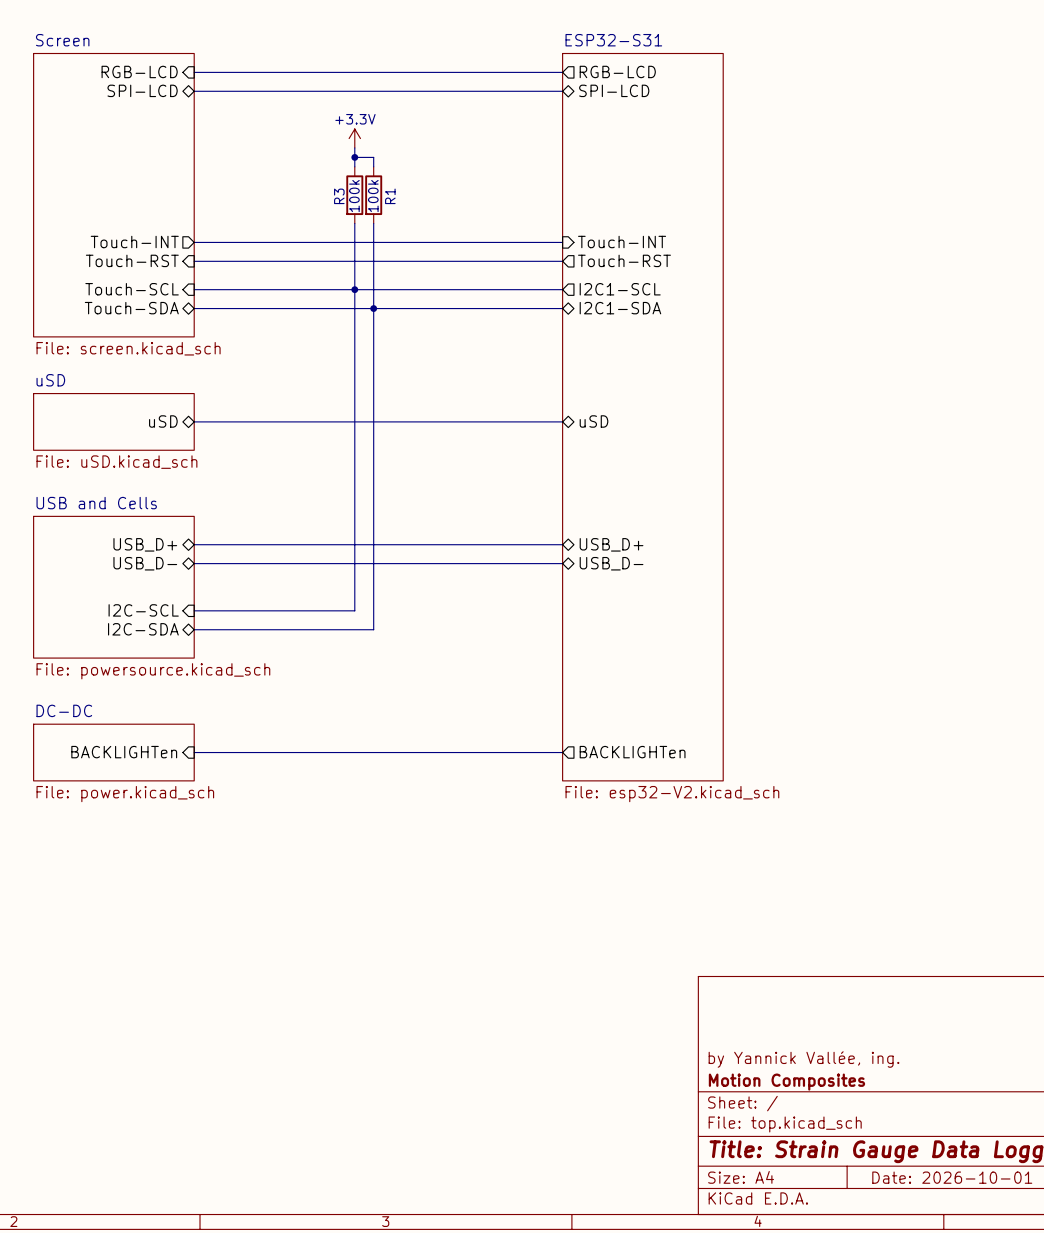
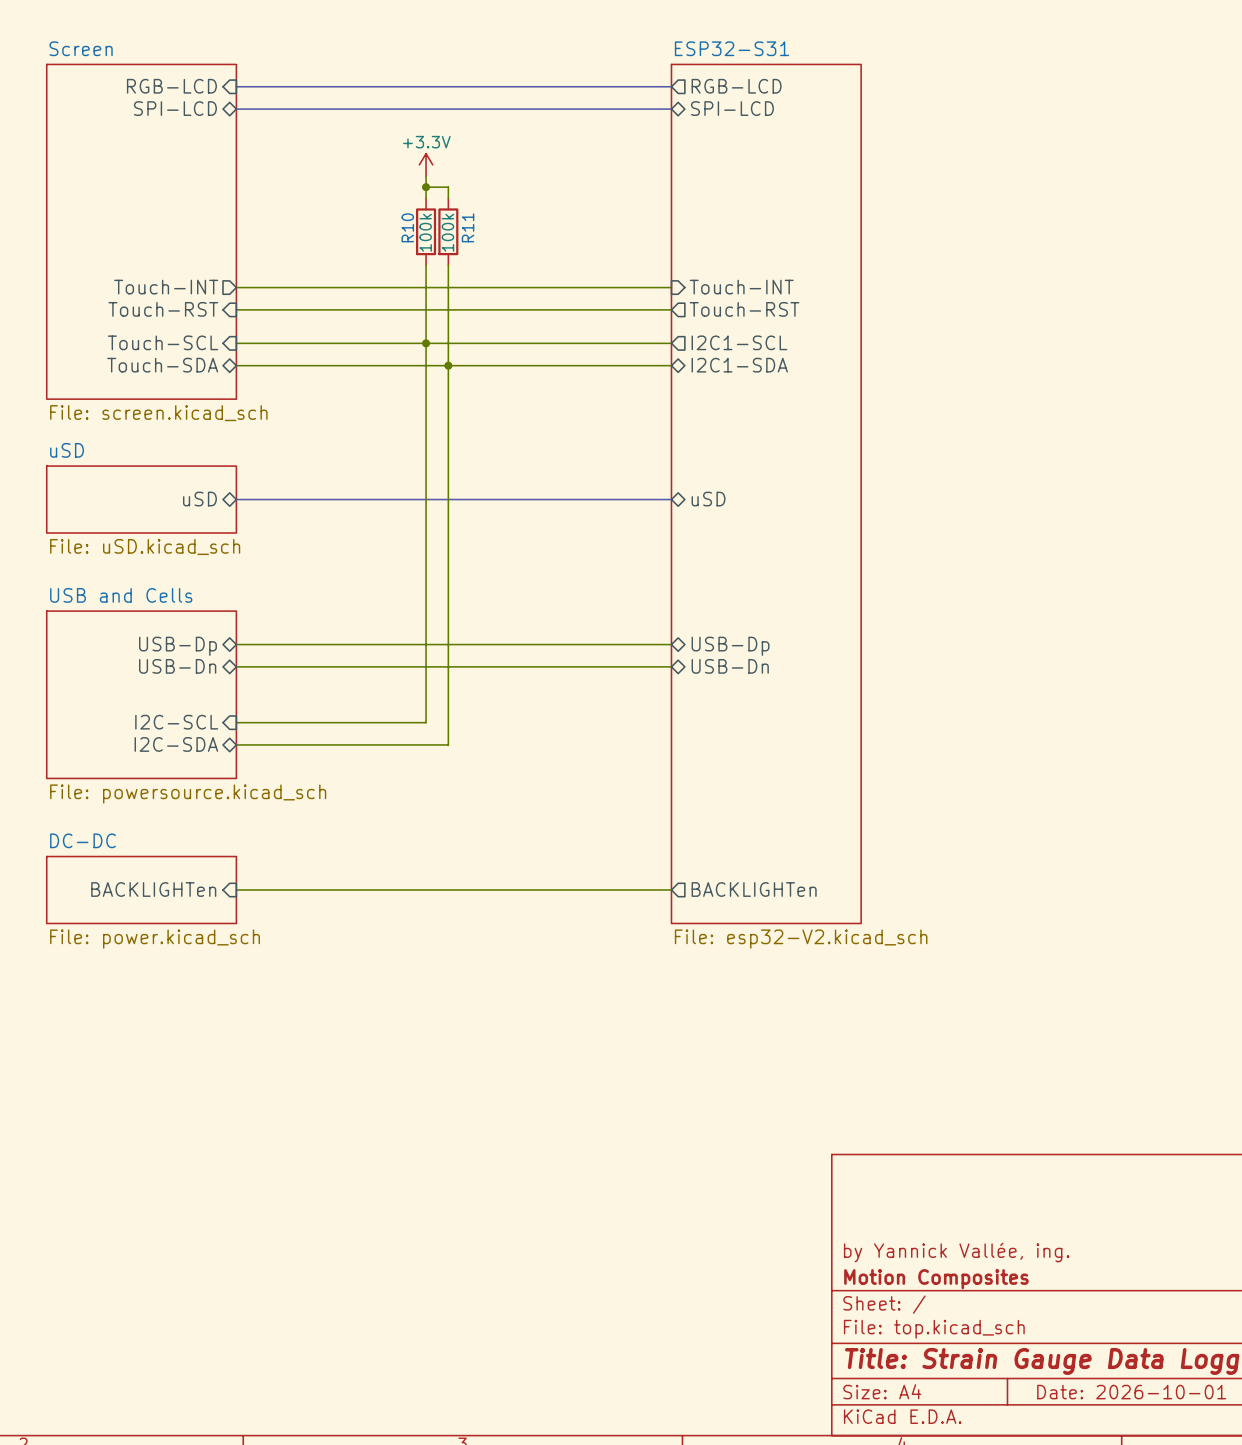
R3 name: R3 (339, 196) -> R10 (407, 227)
R1 name: R1 (390, 196) -> R11 (468, 227)
sheet pin: USB_D+ (145, 544) -> USB-Dp (177, 646)
sheet pin: USB_D+ (611, 544) -> USB-Dp (730, 646)
sheet pin: USB_D- (145, 563) -> USB-Dn (177, 666)
sheet pin: USB_D- (611, 563) -> USB-Dn (730, 666)

